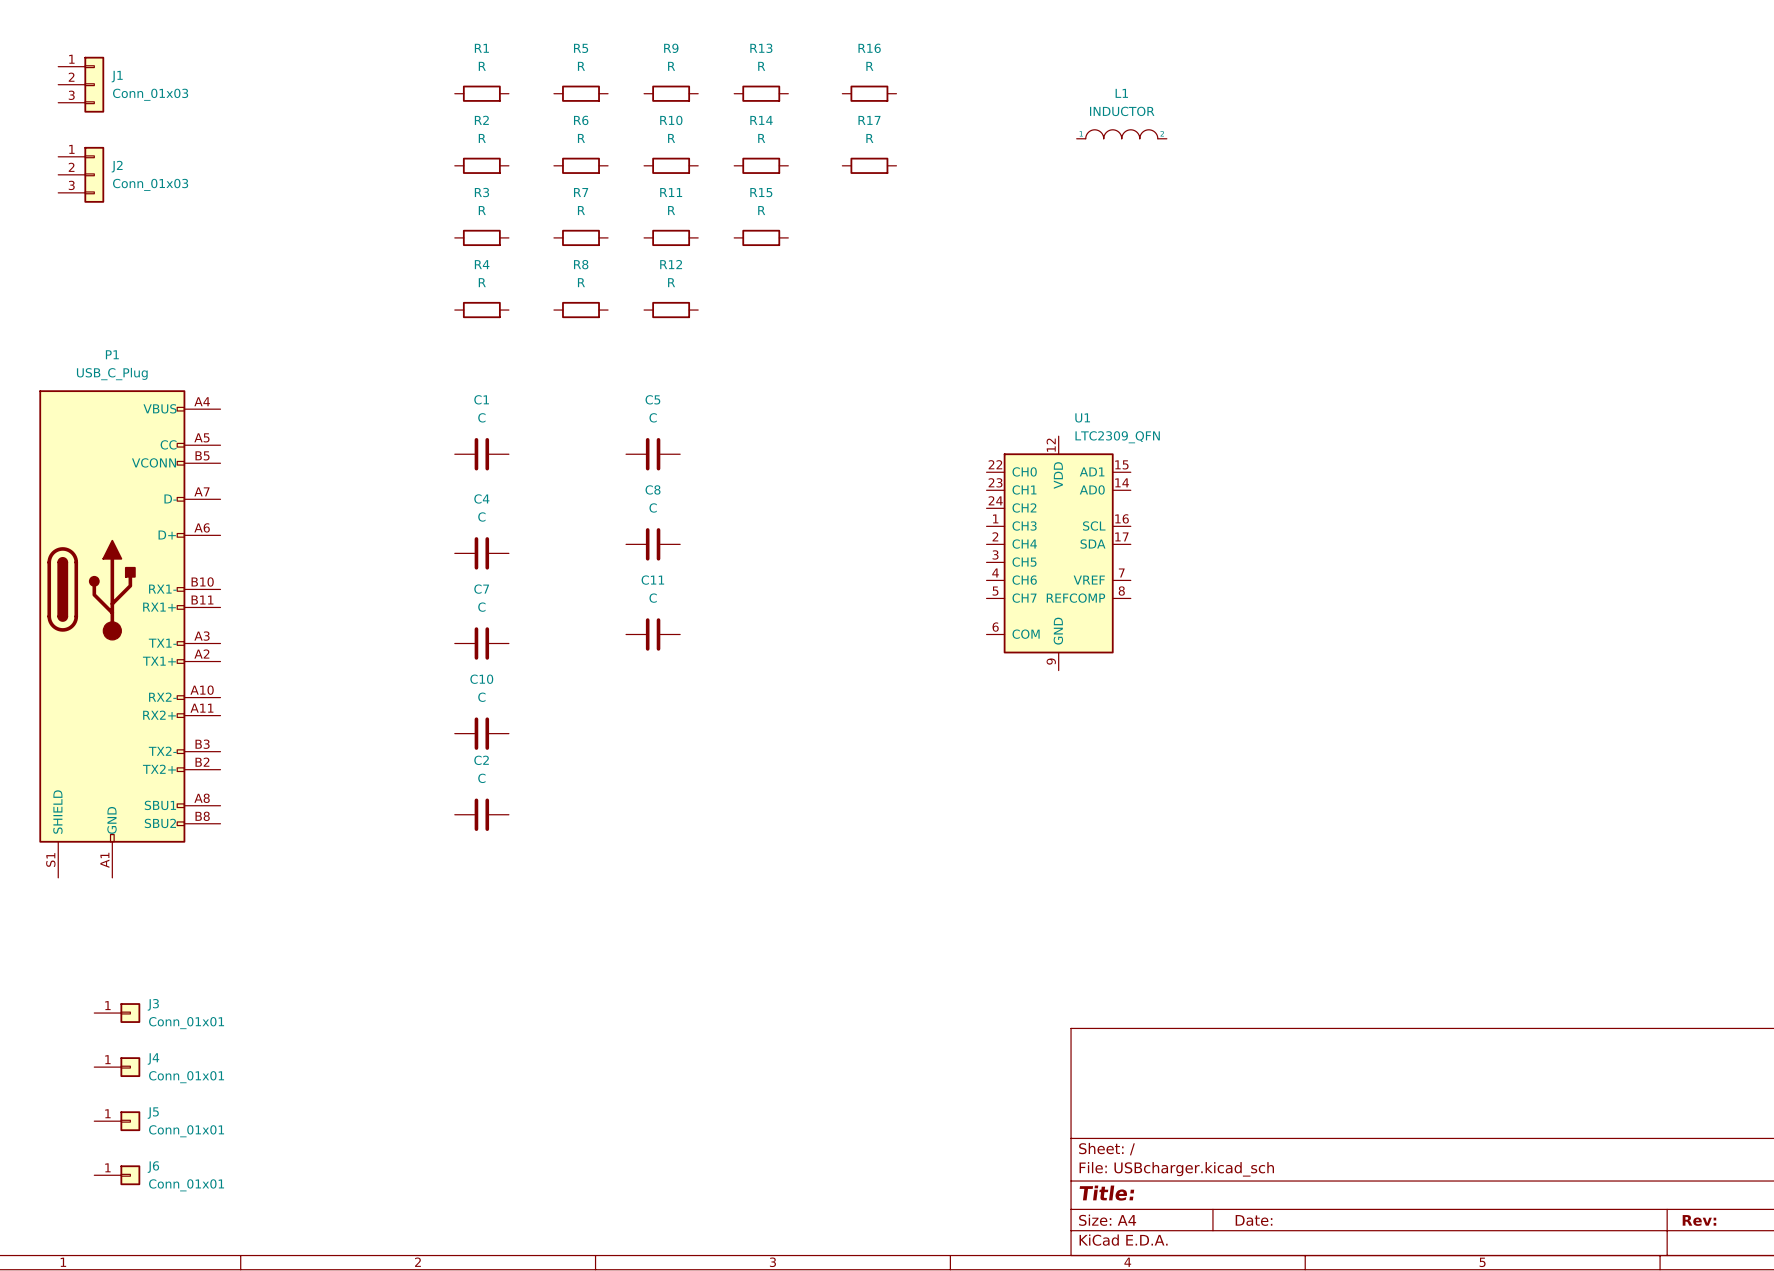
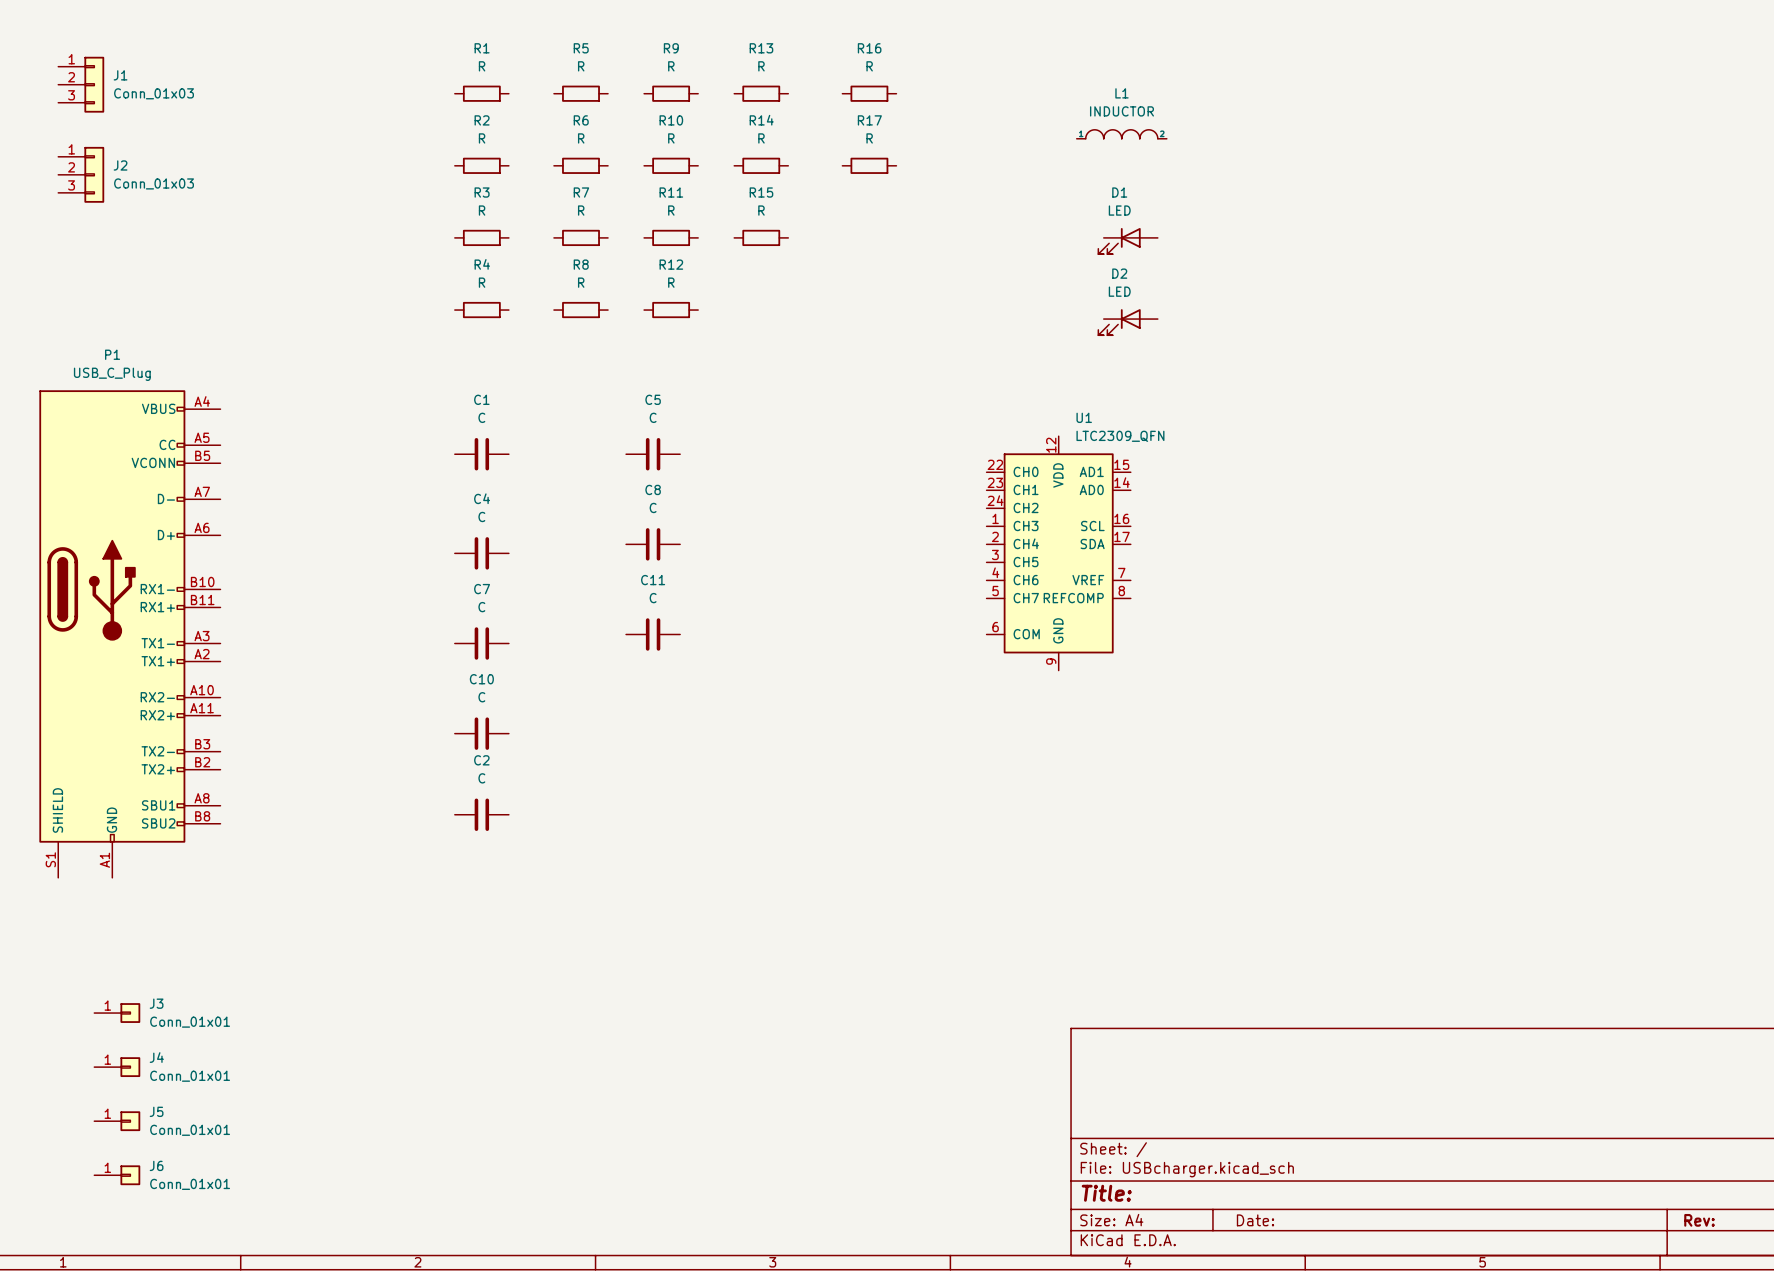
D1: none -> LED (1128, 241)
D2: none -> LED (1128, 322)

